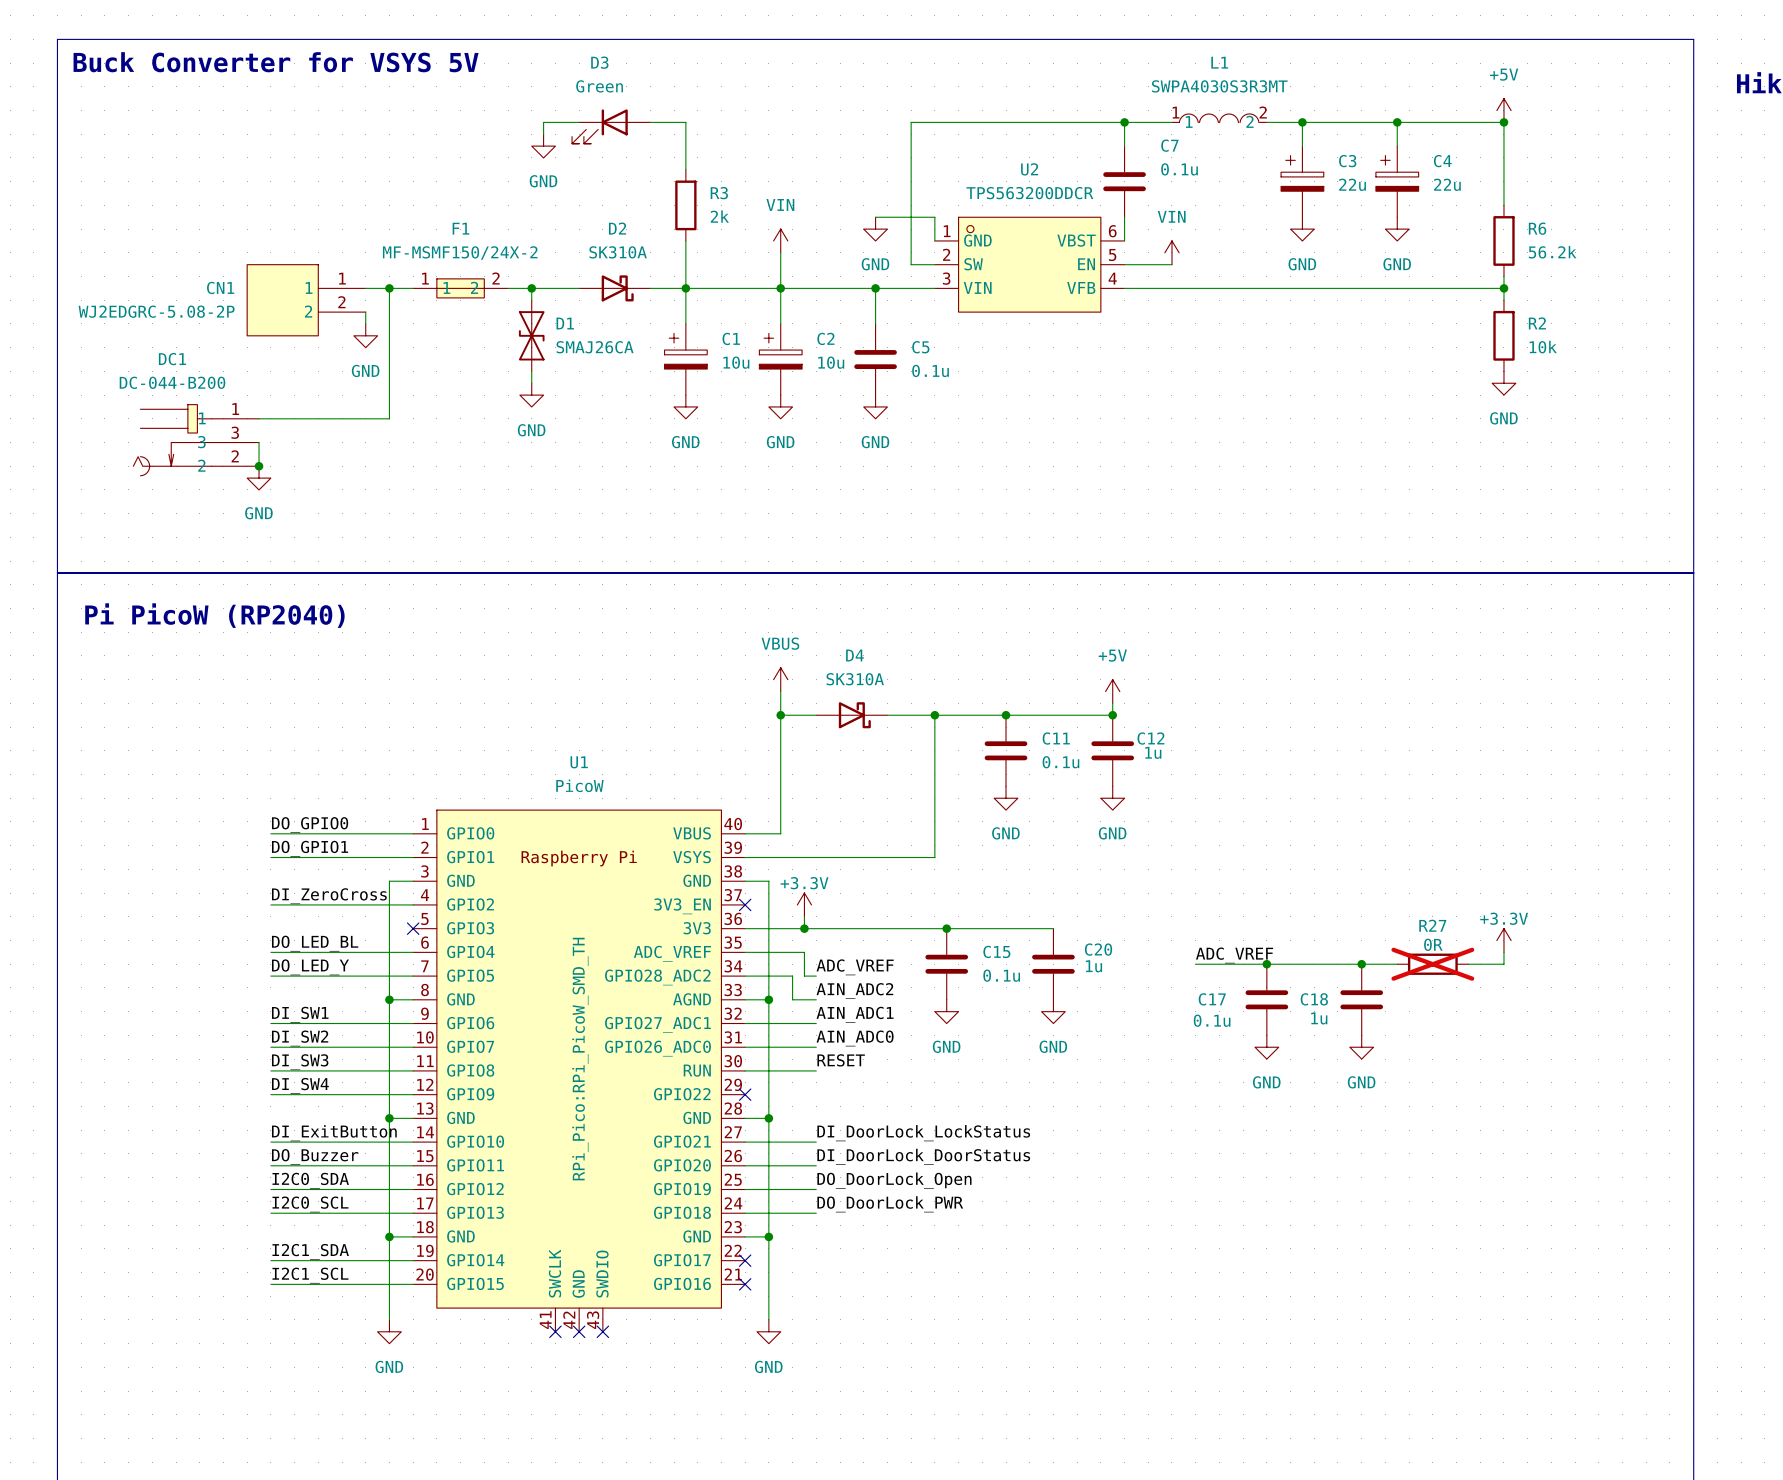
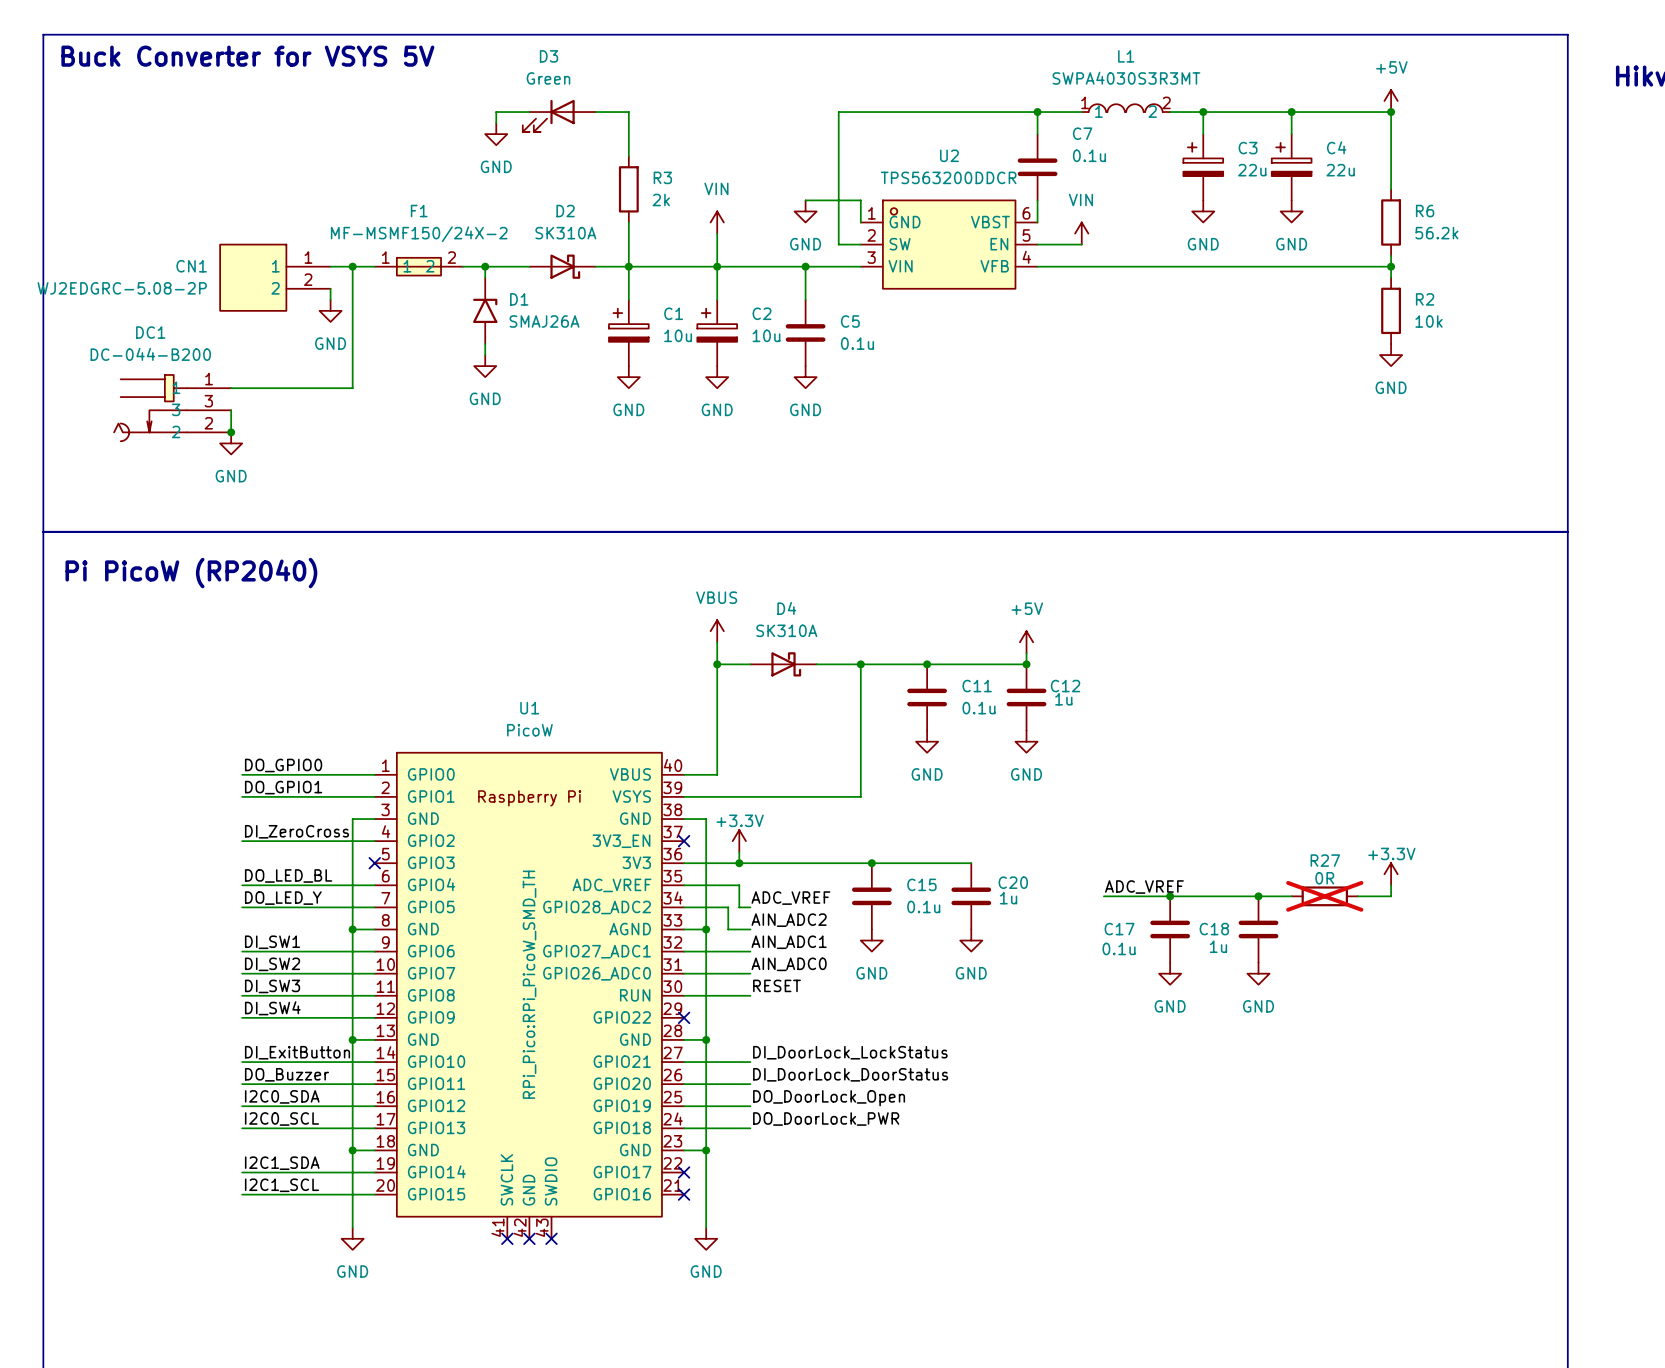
D1 symbol: [518, 300, 545, 372] -> [473, 277, 498, 345]
D1 value: SMAJ26CA (595, 347) -> SMAJ26A (544, 321)

